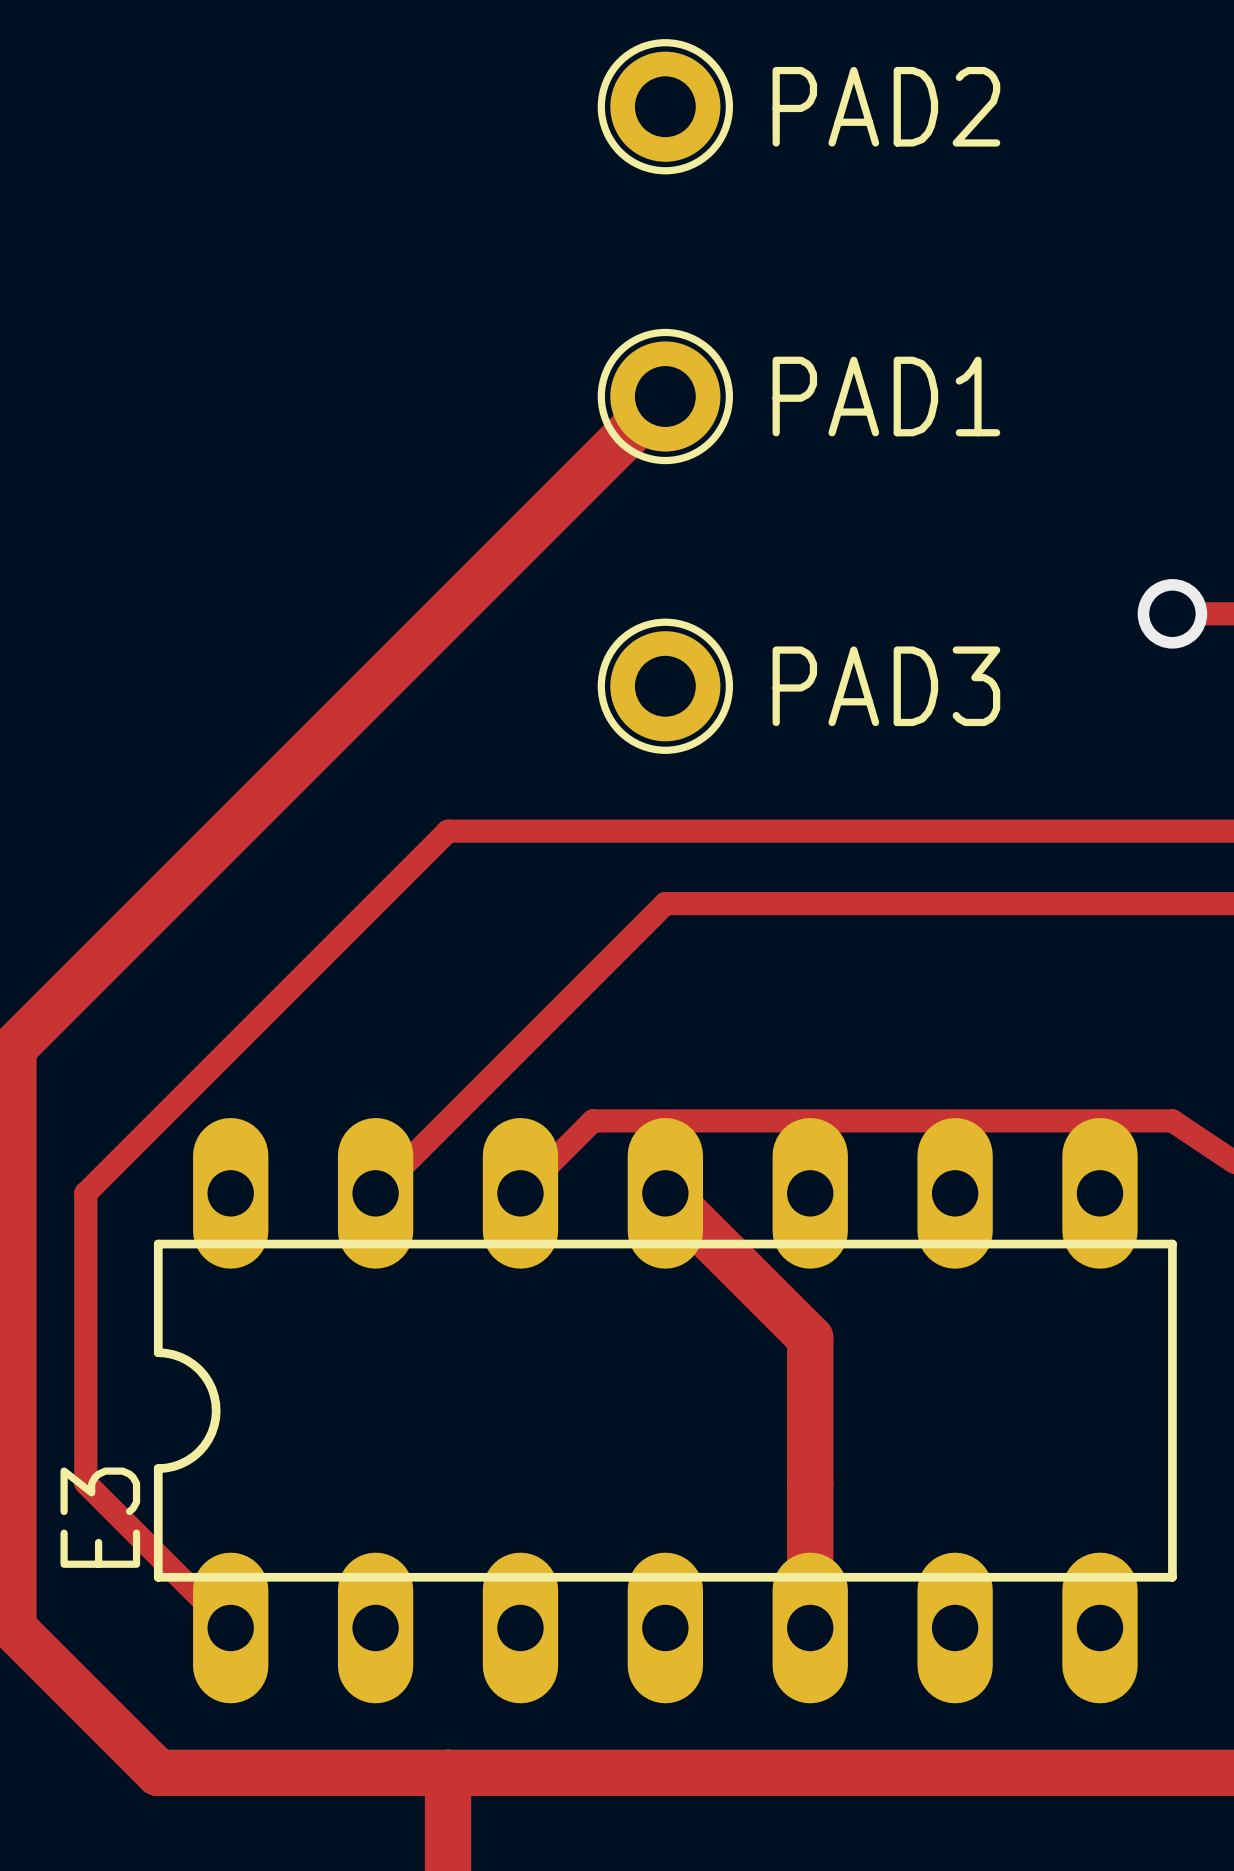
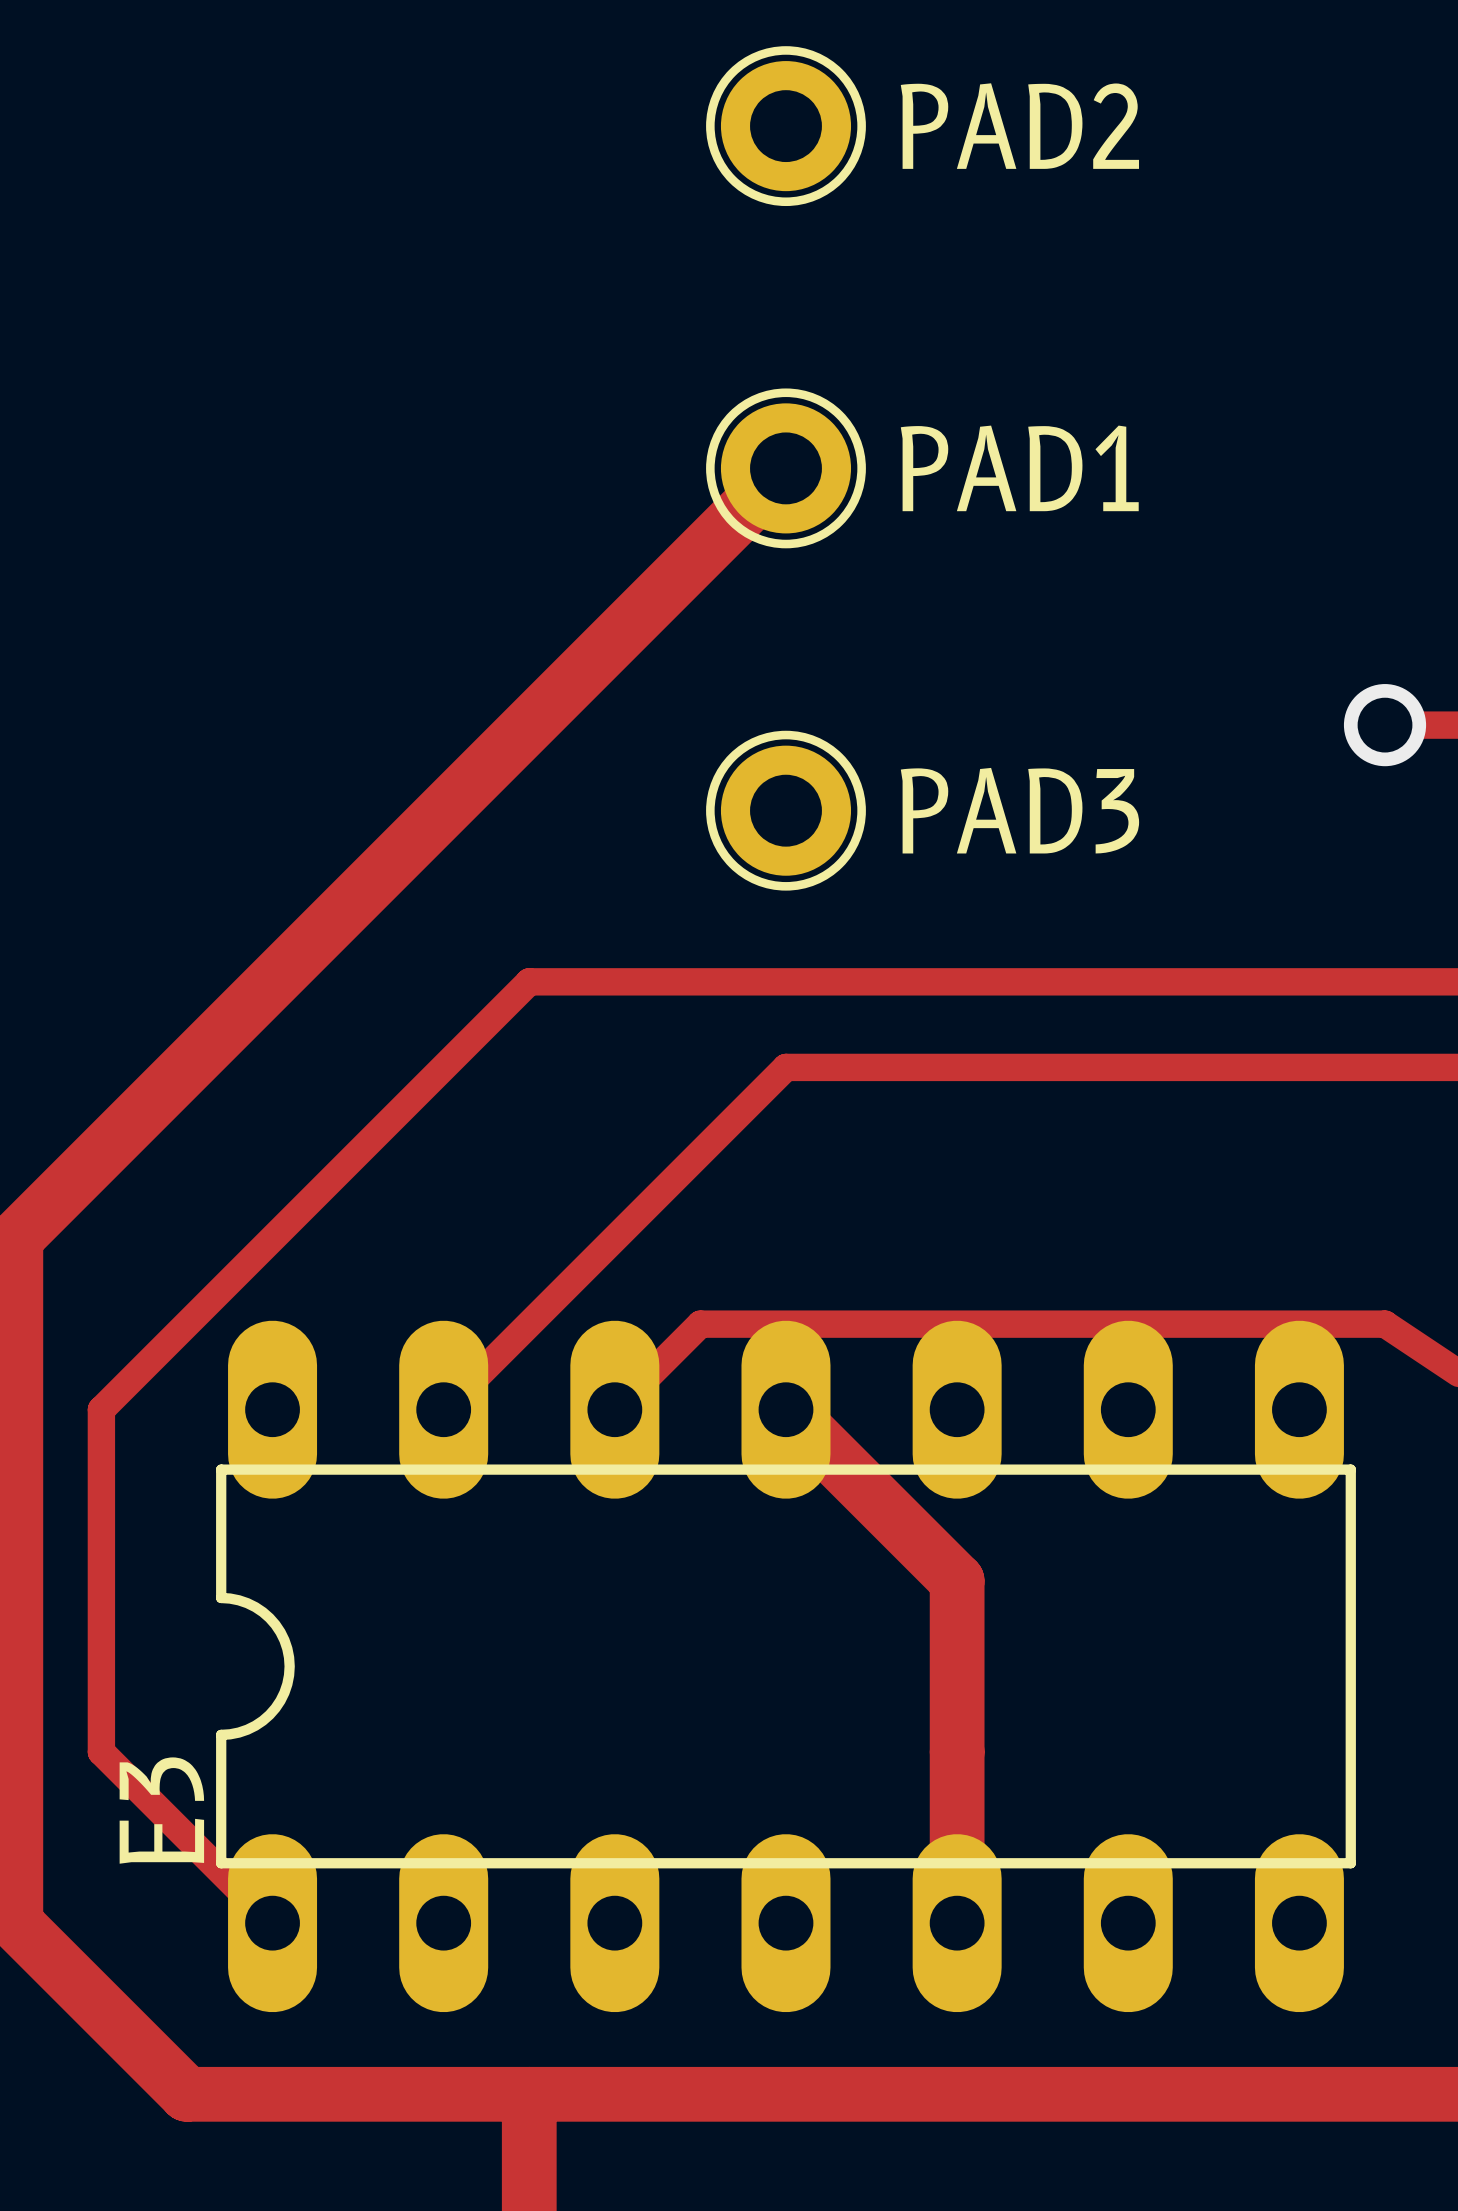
E3 footprint: [153, 1118, 1177, 1704] -> [216, 1320, 1356, 2013]
E3 name position: E3 (100, 1517) -> E3 (161, 1810)

